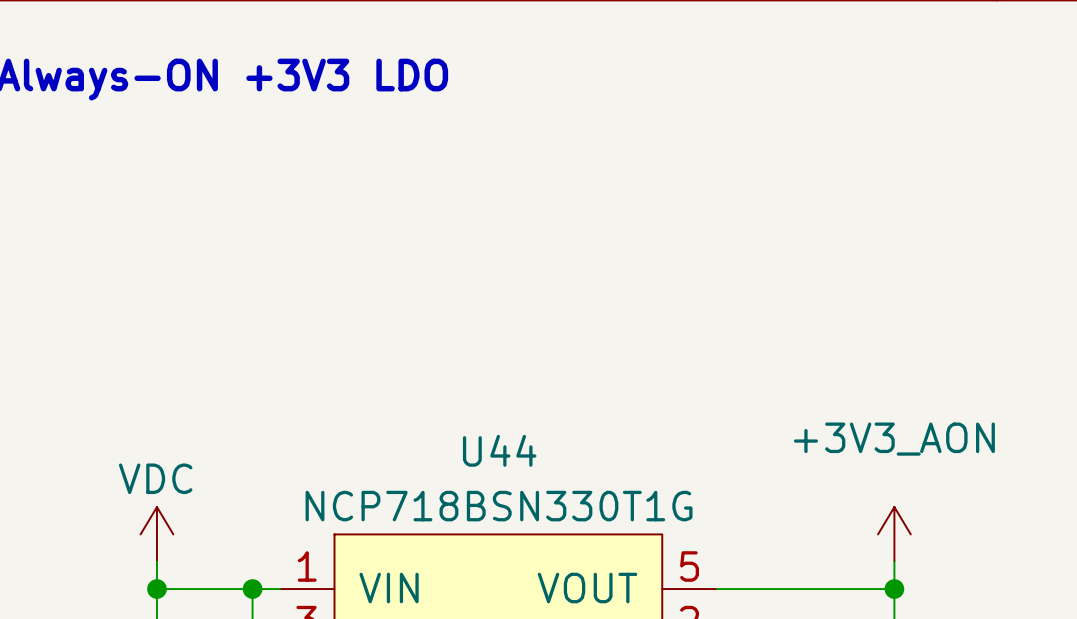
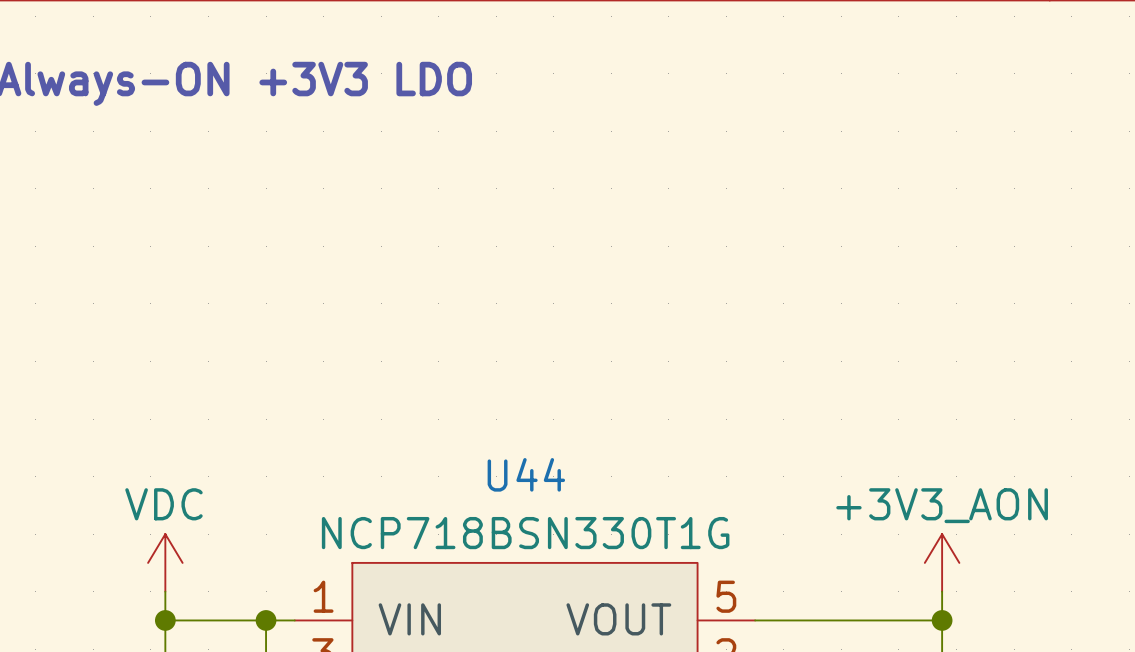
power symbol text position: +3V3_AON (894, 439) -> +3V3_AON (942, 505)

